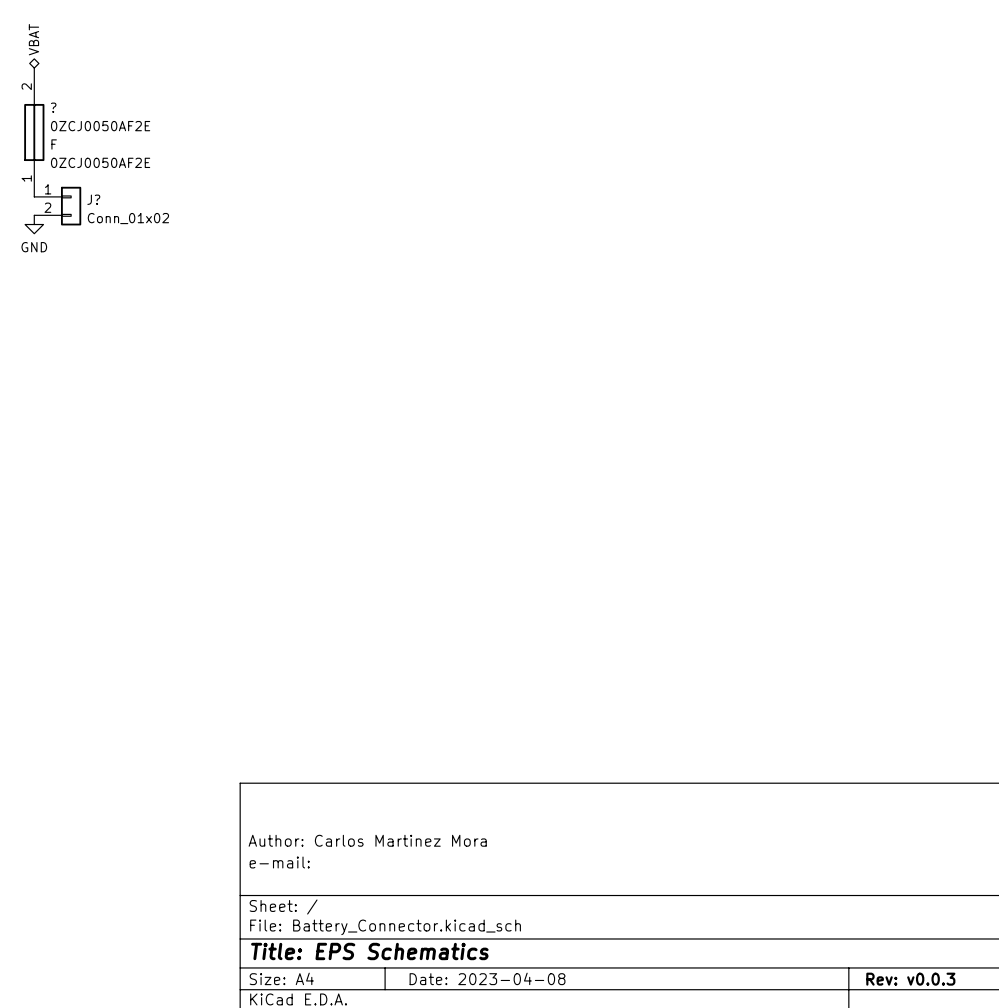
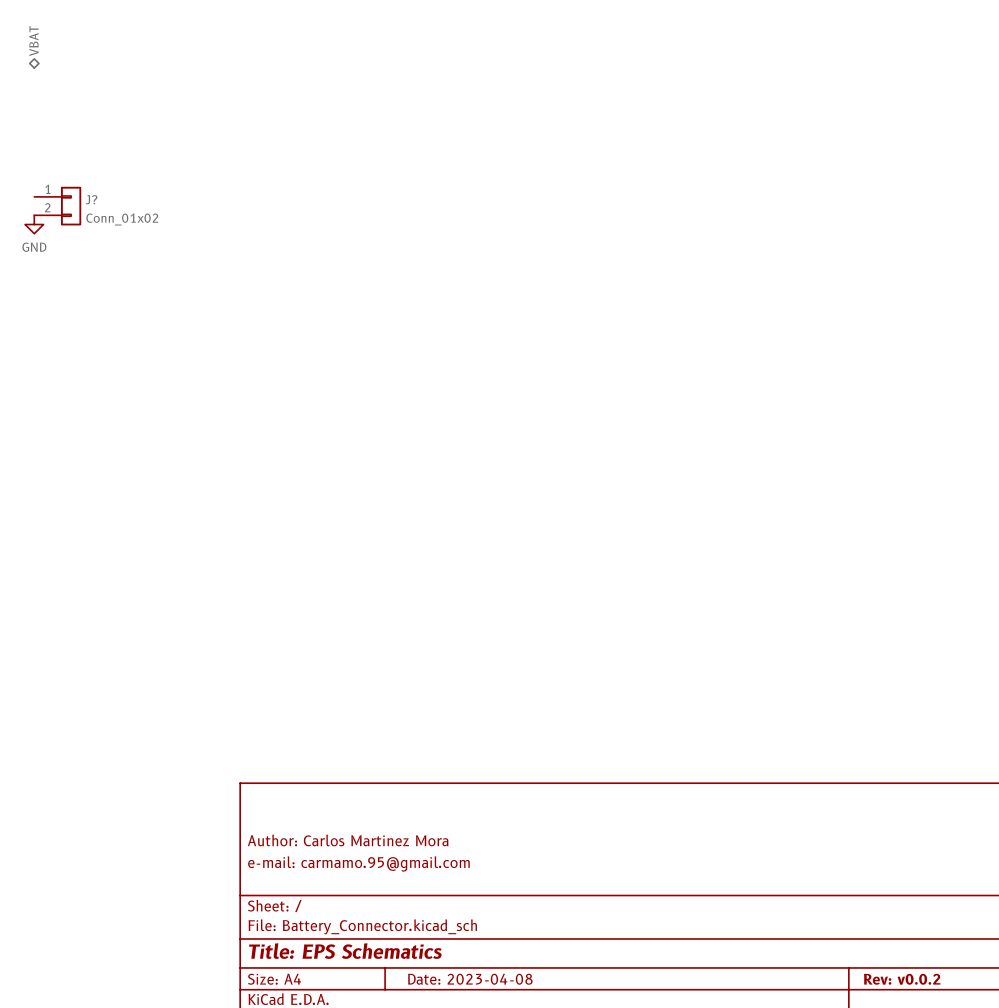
part: 0ZCJ0050AF2E (34, 132) -> none
title block: e-mail: (279, 862) -> e-mail: carmamo.95@gmail.com (358, 863)
title block: Rev: v0.0.3 (910, 979) -> Rev: v0.0.2 (902, 979)

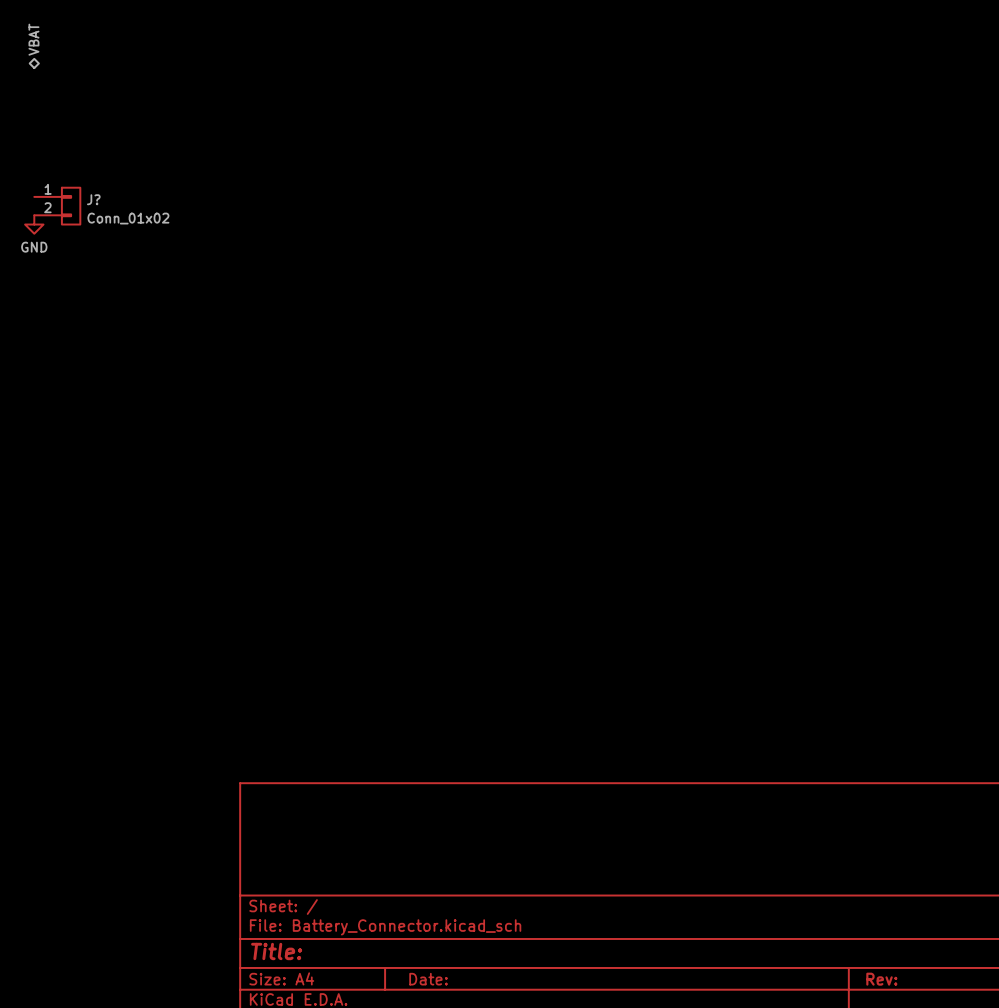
title block: Author: Carlos Martinez Mora (348, 840) -> none
title block: e-mail: carmamo.95@gmail.com (358, 863) -> none
title block: Title: EPS Schematics (345, 951) -> Title: (276, 951)
title block: Date: 2023-04-08 (470, 979) -> Date: (428, 979)
title block: Rev: v0.0.2 (902, 979) -> Rev: (881, 979)

